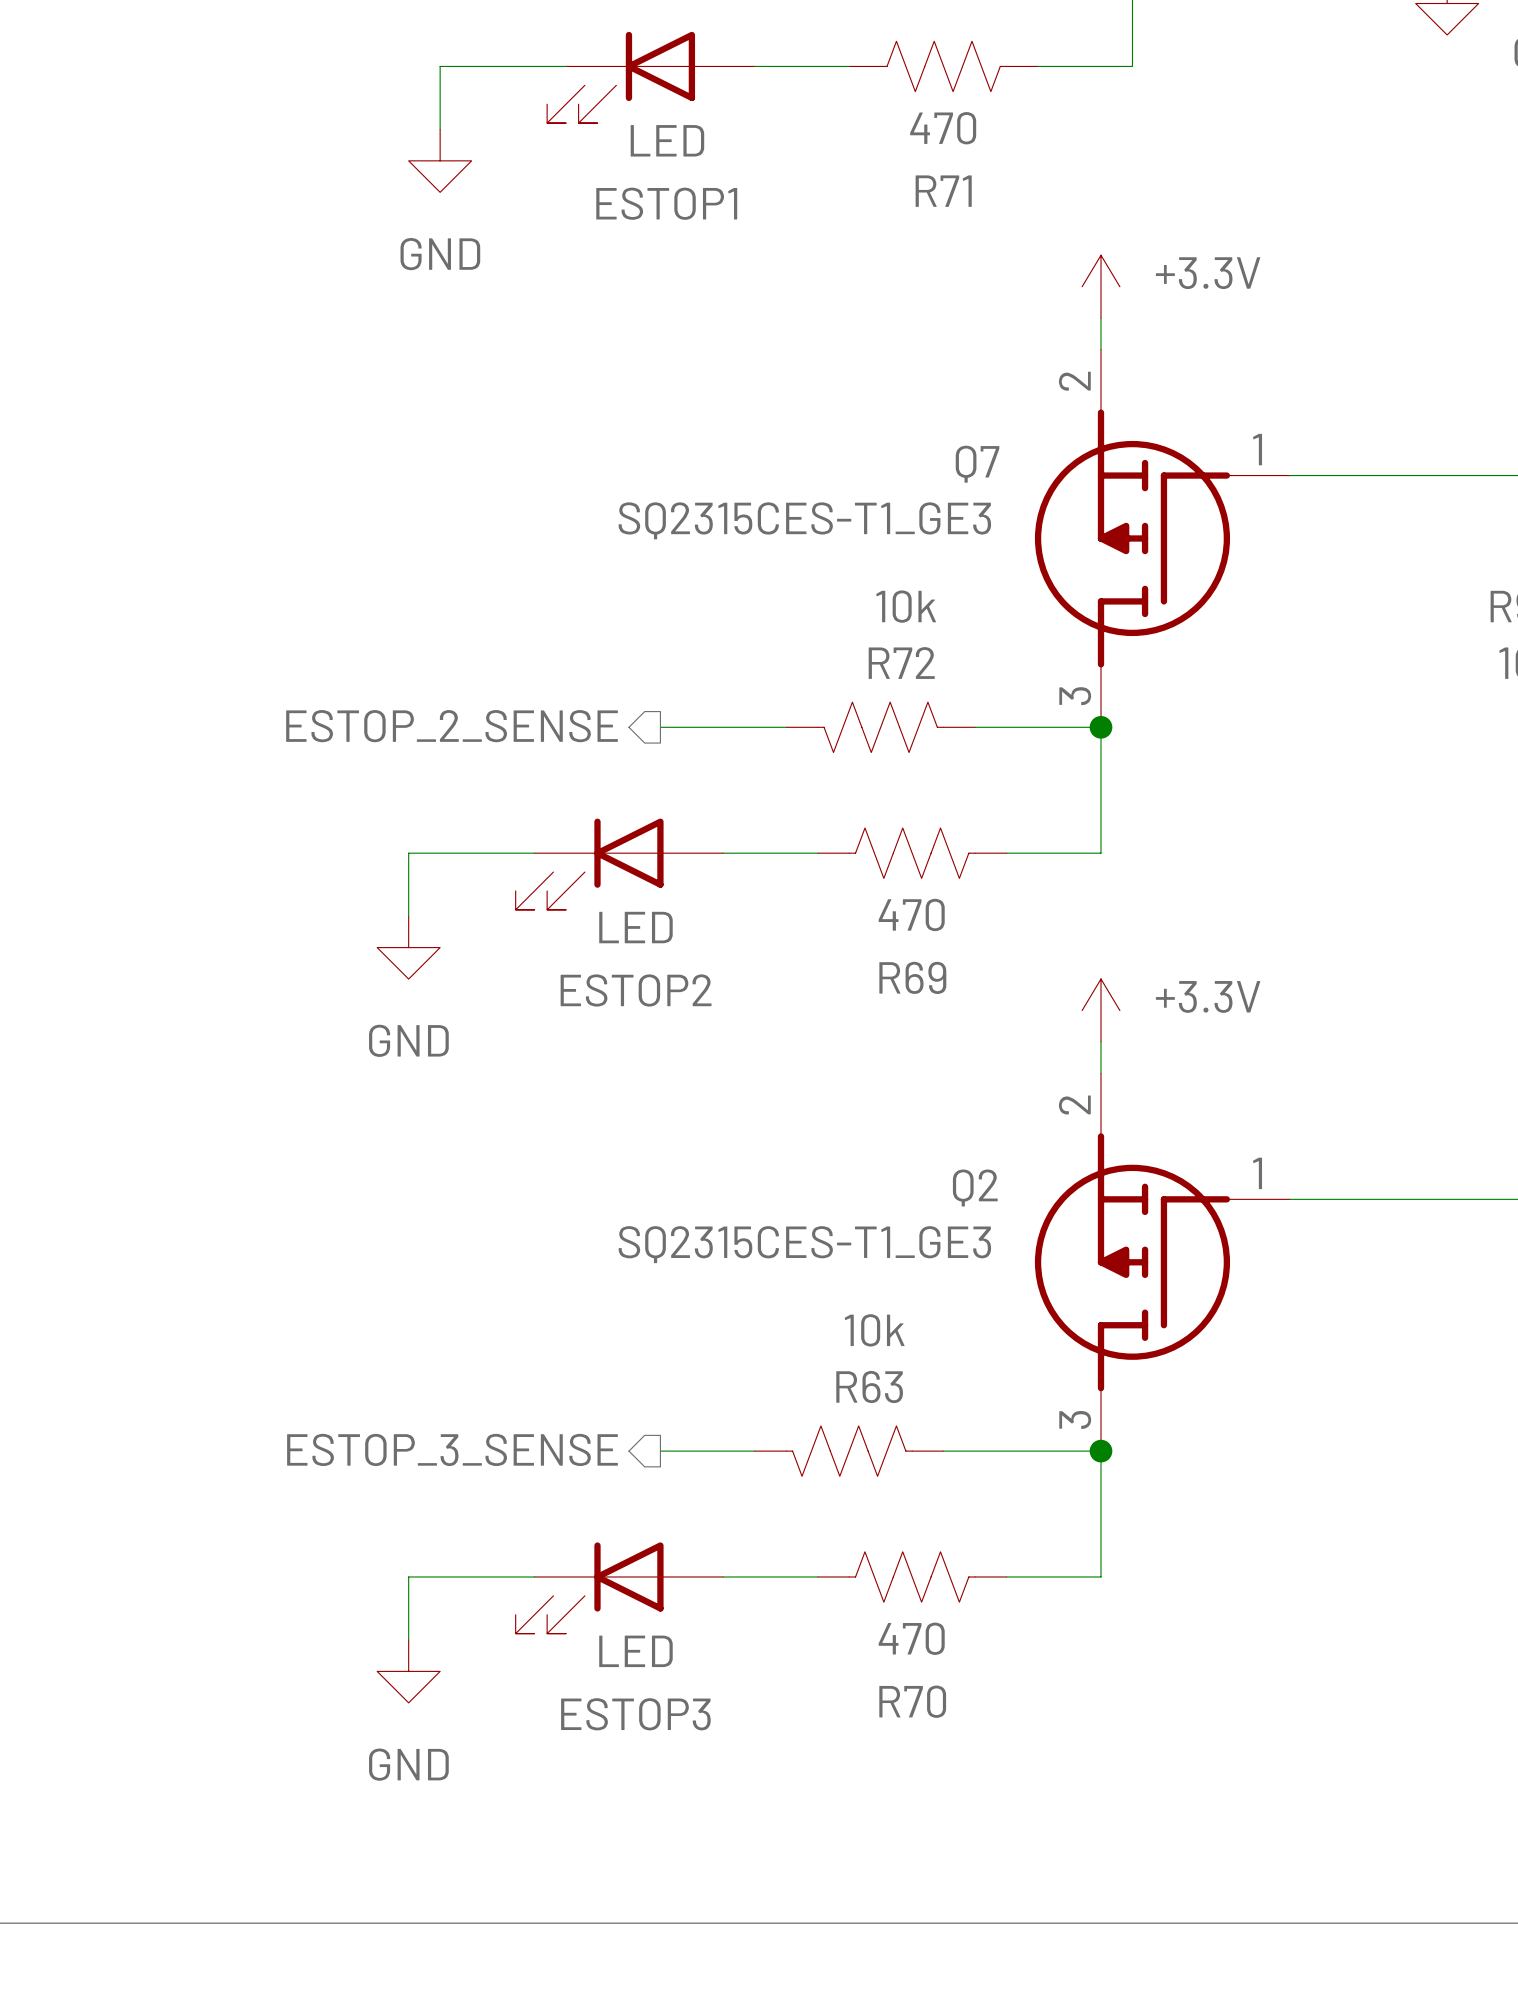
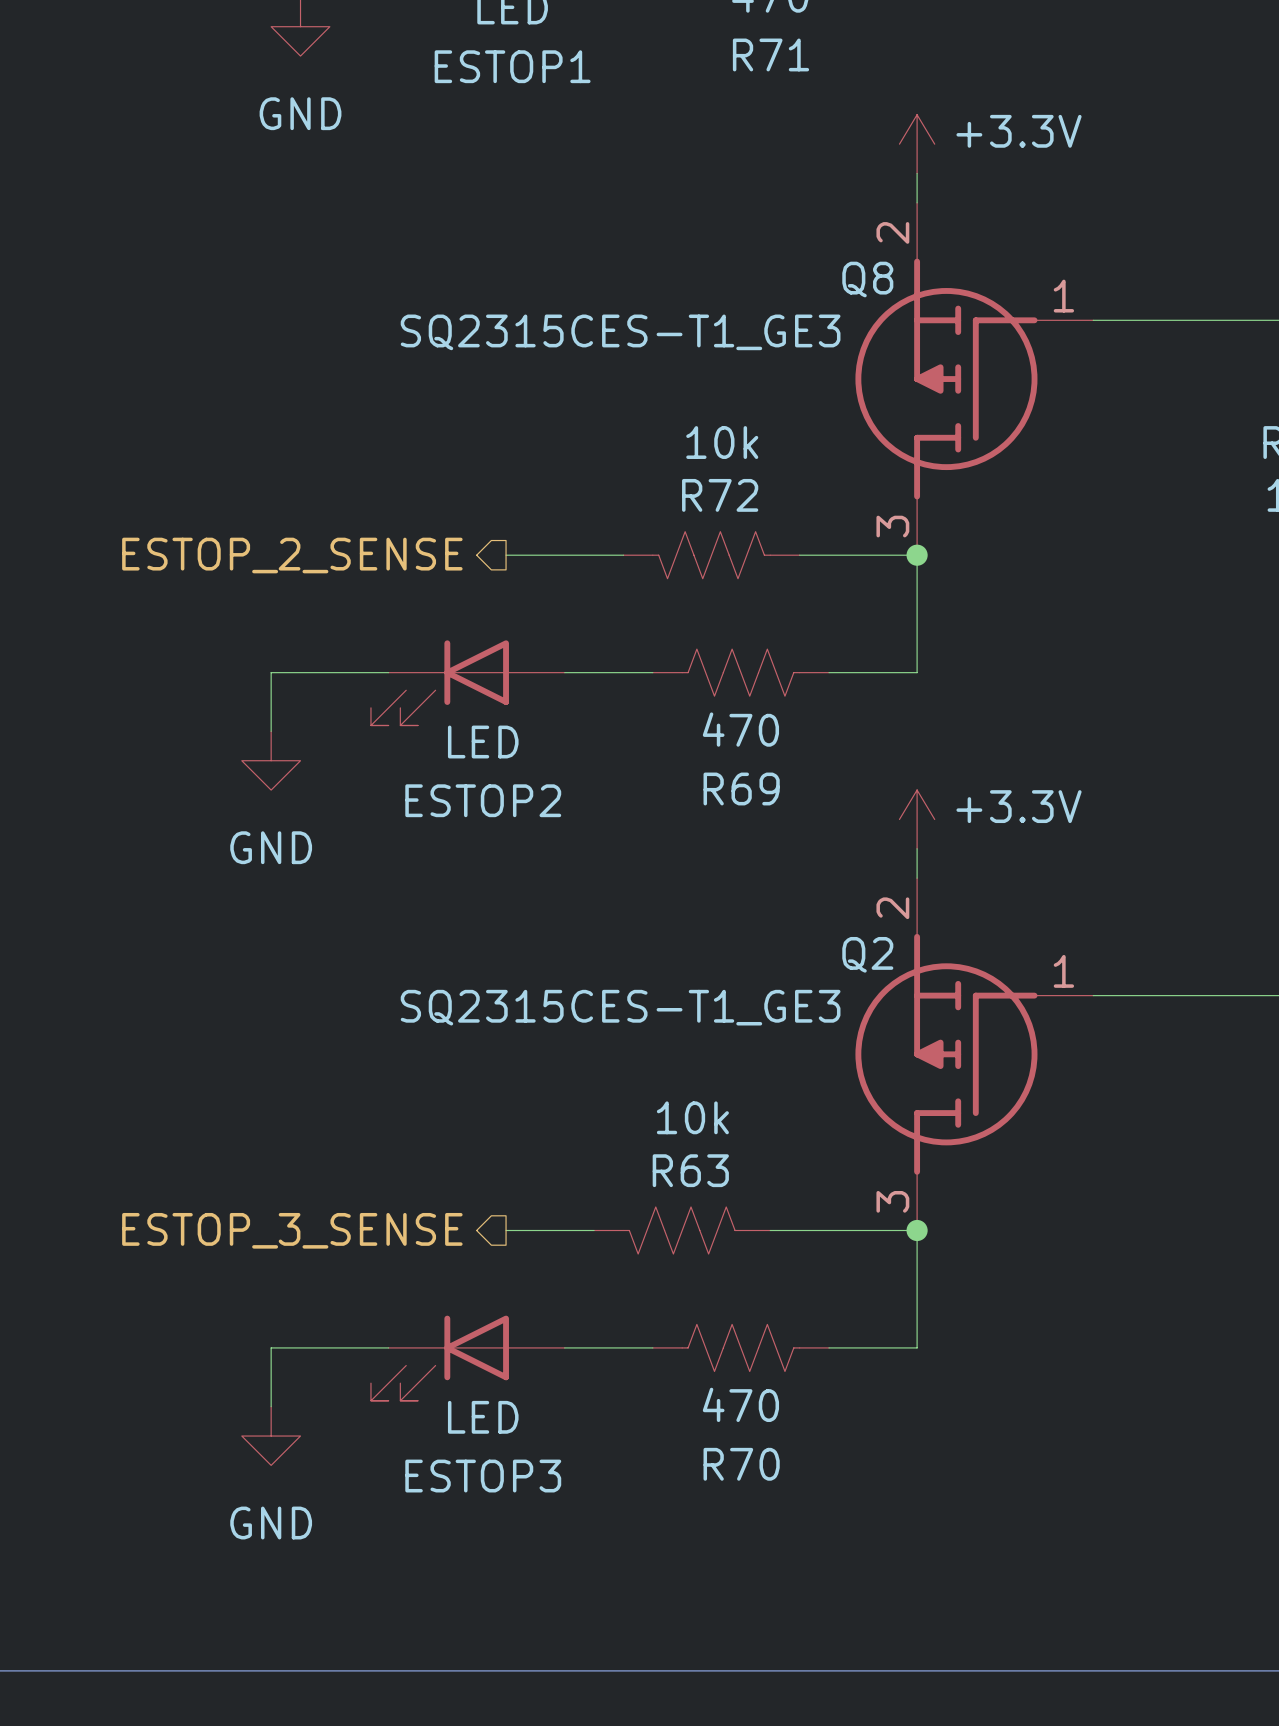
Q7 name: Q7 (977, 464) -> Q8 (867, 279)
Q7 value position: SQ2315CES-T1_GE3 (804, 520) -> SQ2315CES-T1_GE3 (620, 332)
Q2 name position: Q2 (975, 1188) -> Q2 (867, 954)
Q2 value position: SQ2315CES-T1_GE3 (804, 1244) -> SQ2315CES-T1_GE3 (620, 1007)

